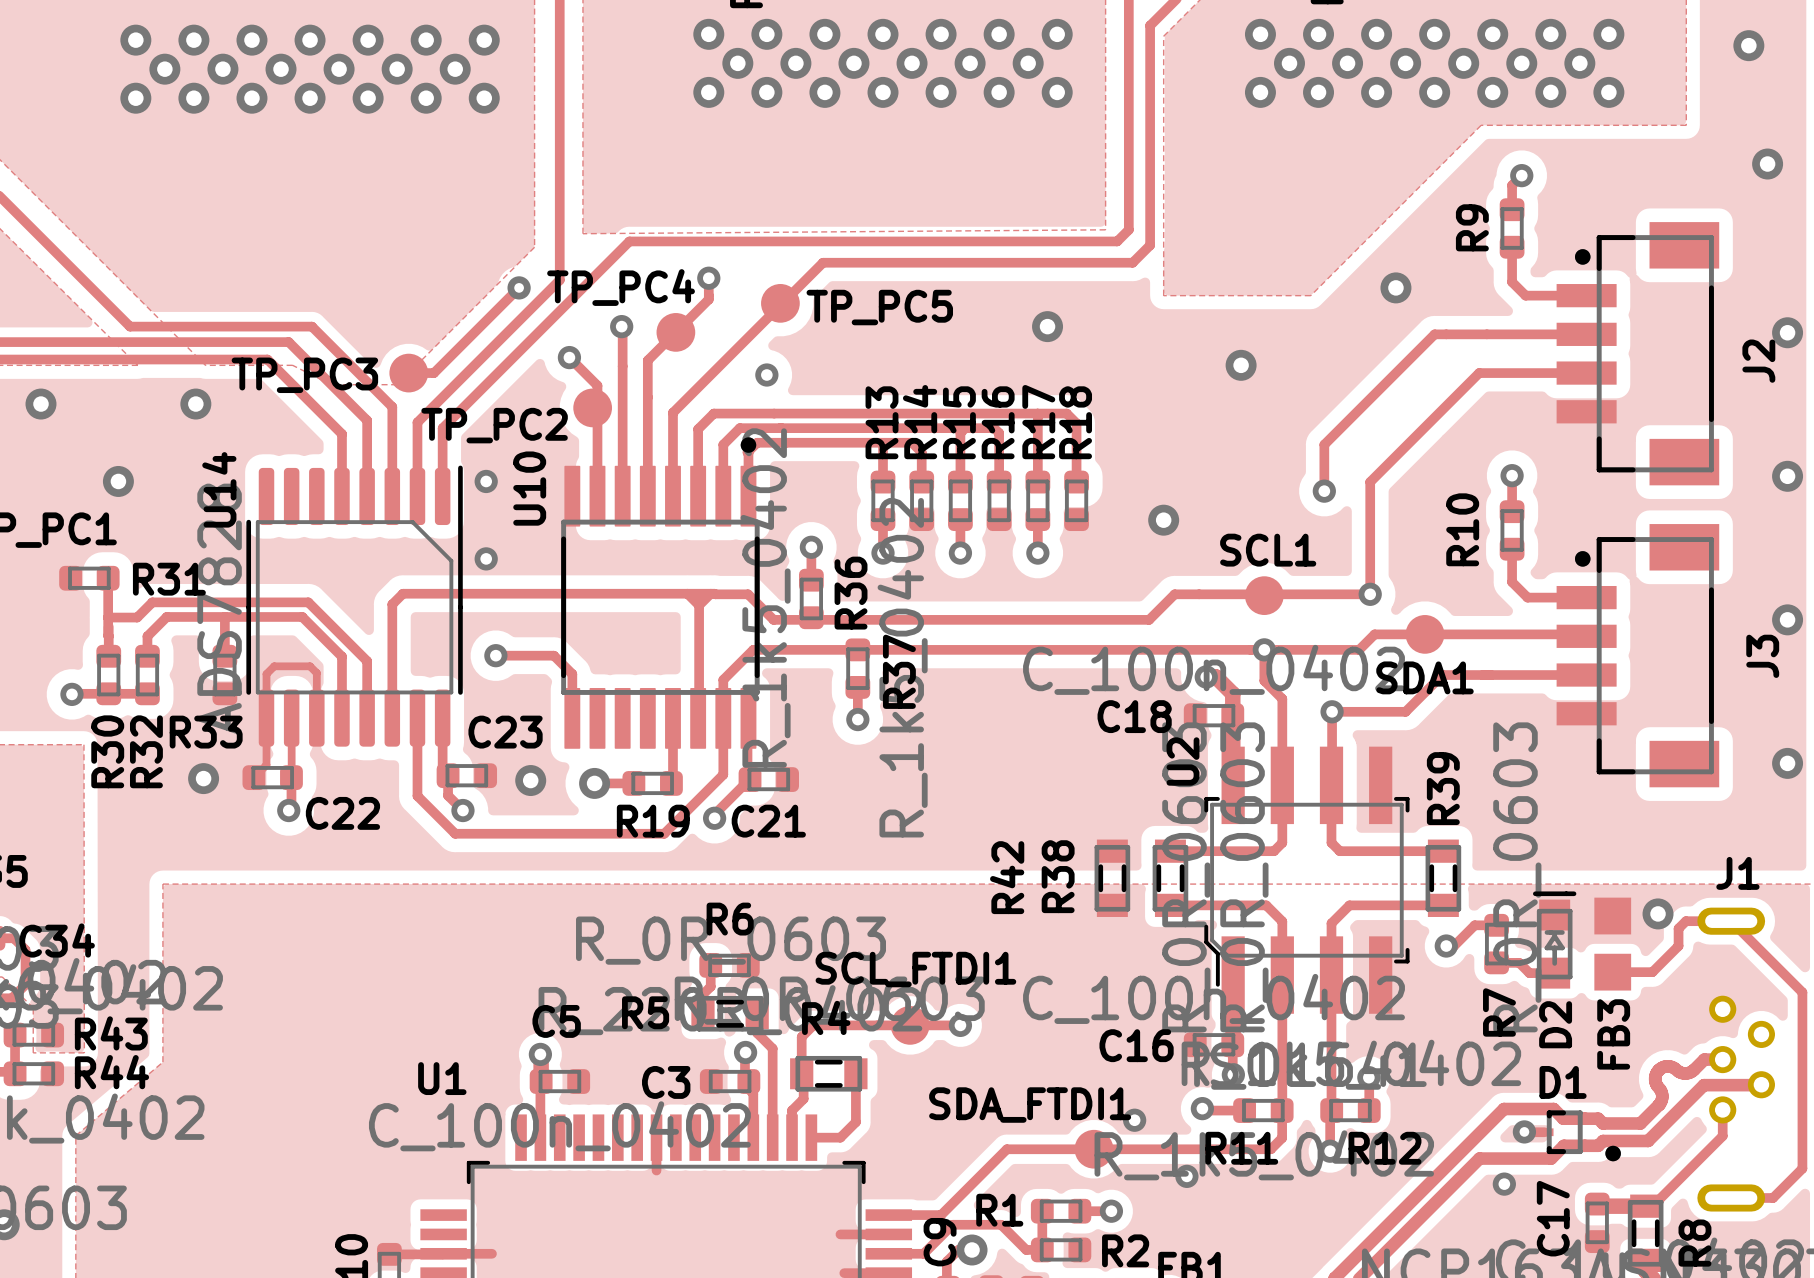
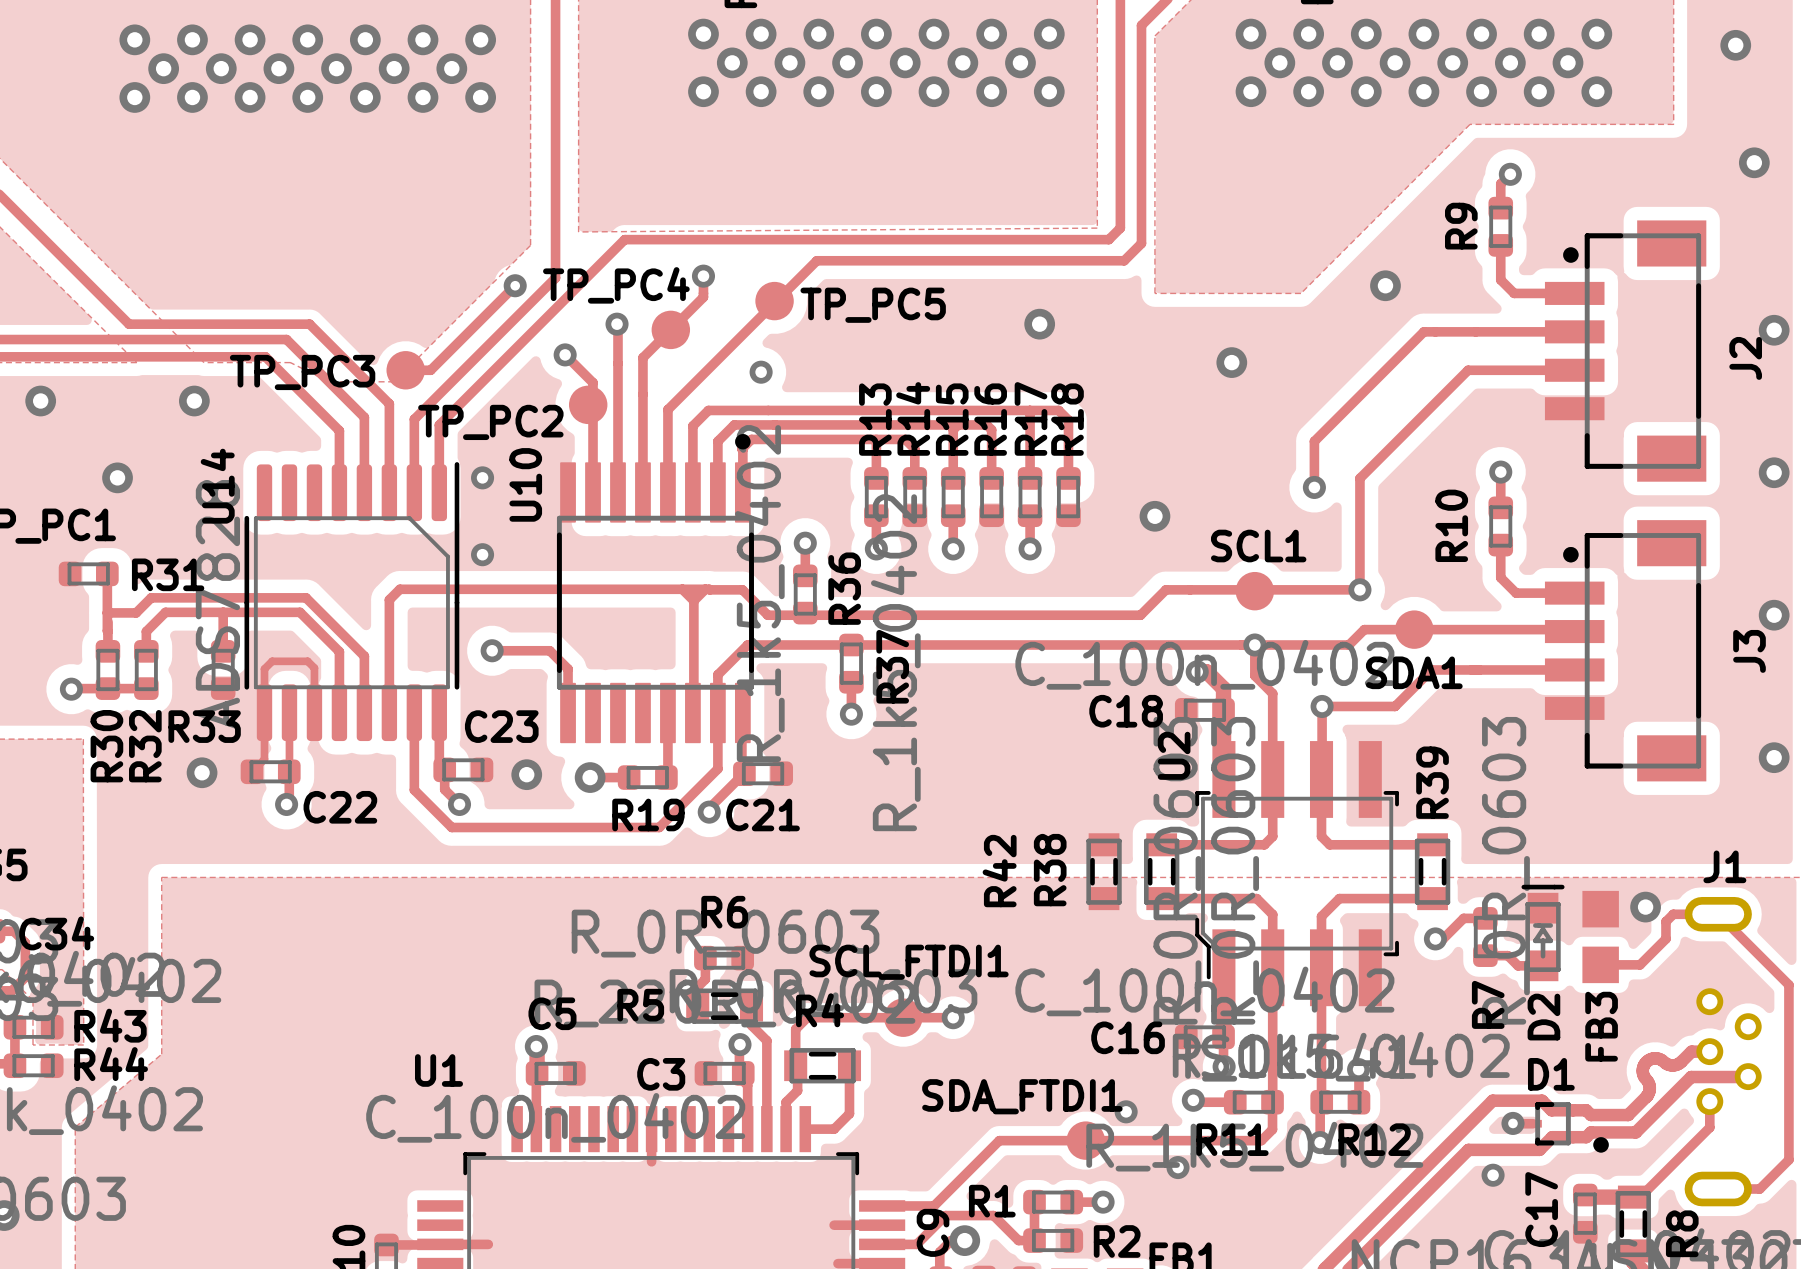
J1 footprint: [1697, 907, 1775, 1212] -> [1684, 896, 1762, 1207]

